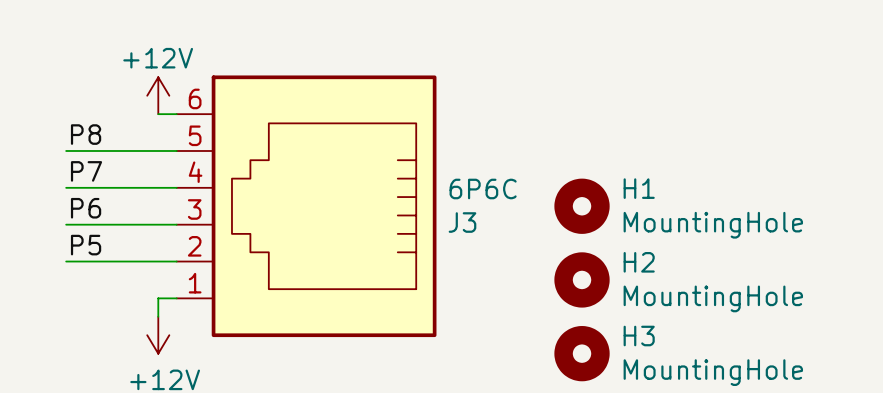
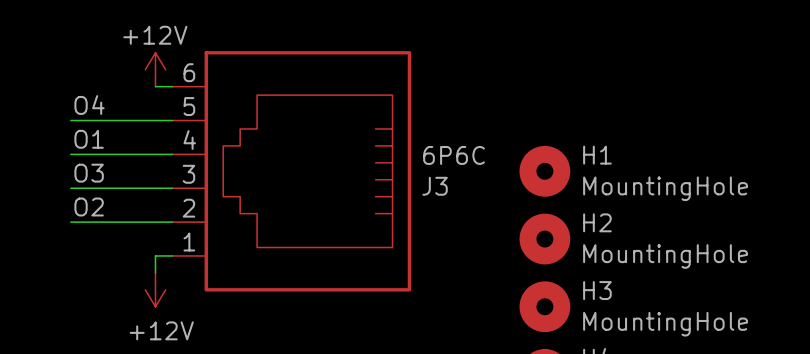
label: P8 (86, 134) -> O4 (89, 105)
label: P7 (86, 171) -> O1 (89, 139)
label: P6 (86, 208) -> O3 (89, 173)
label: P5 (86, 245) -> O2 (89, 207)

